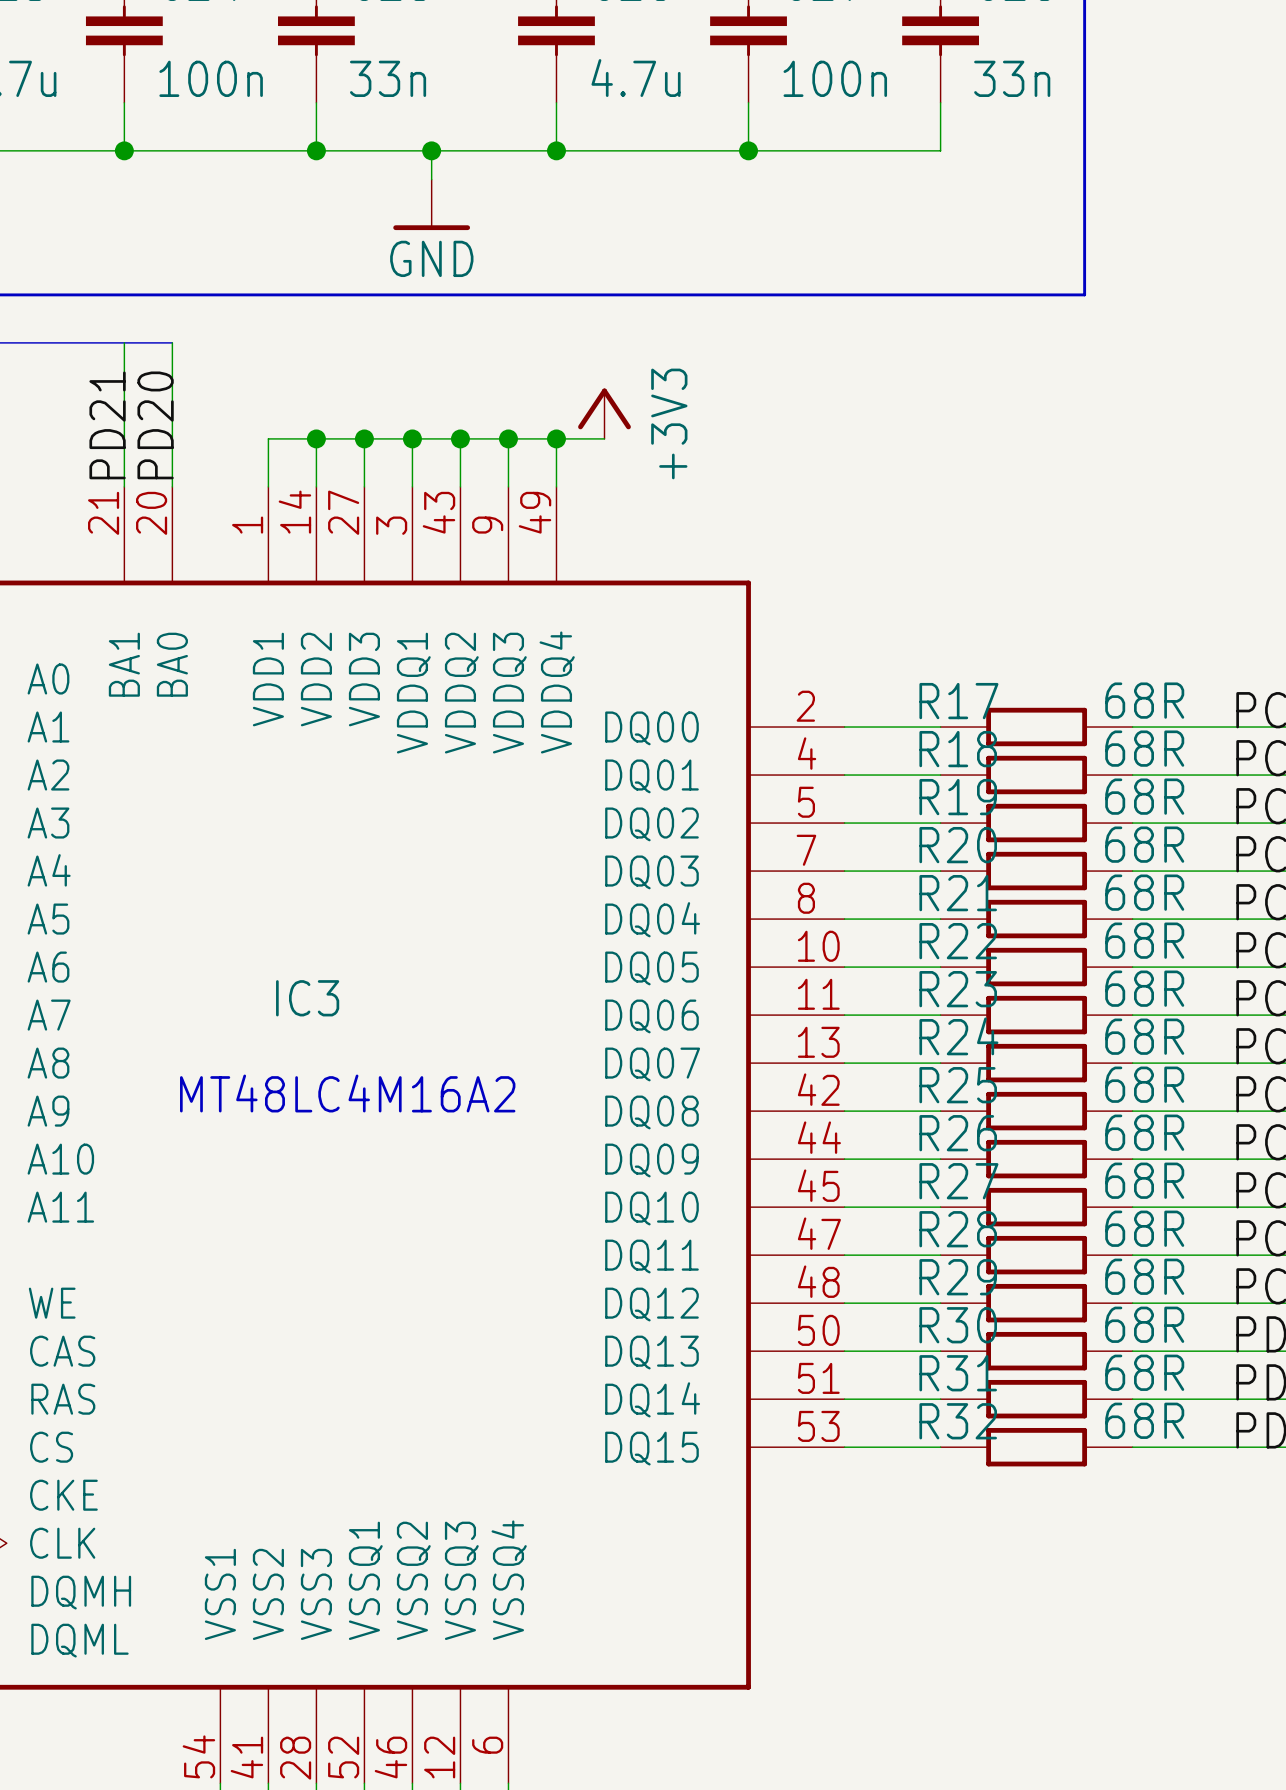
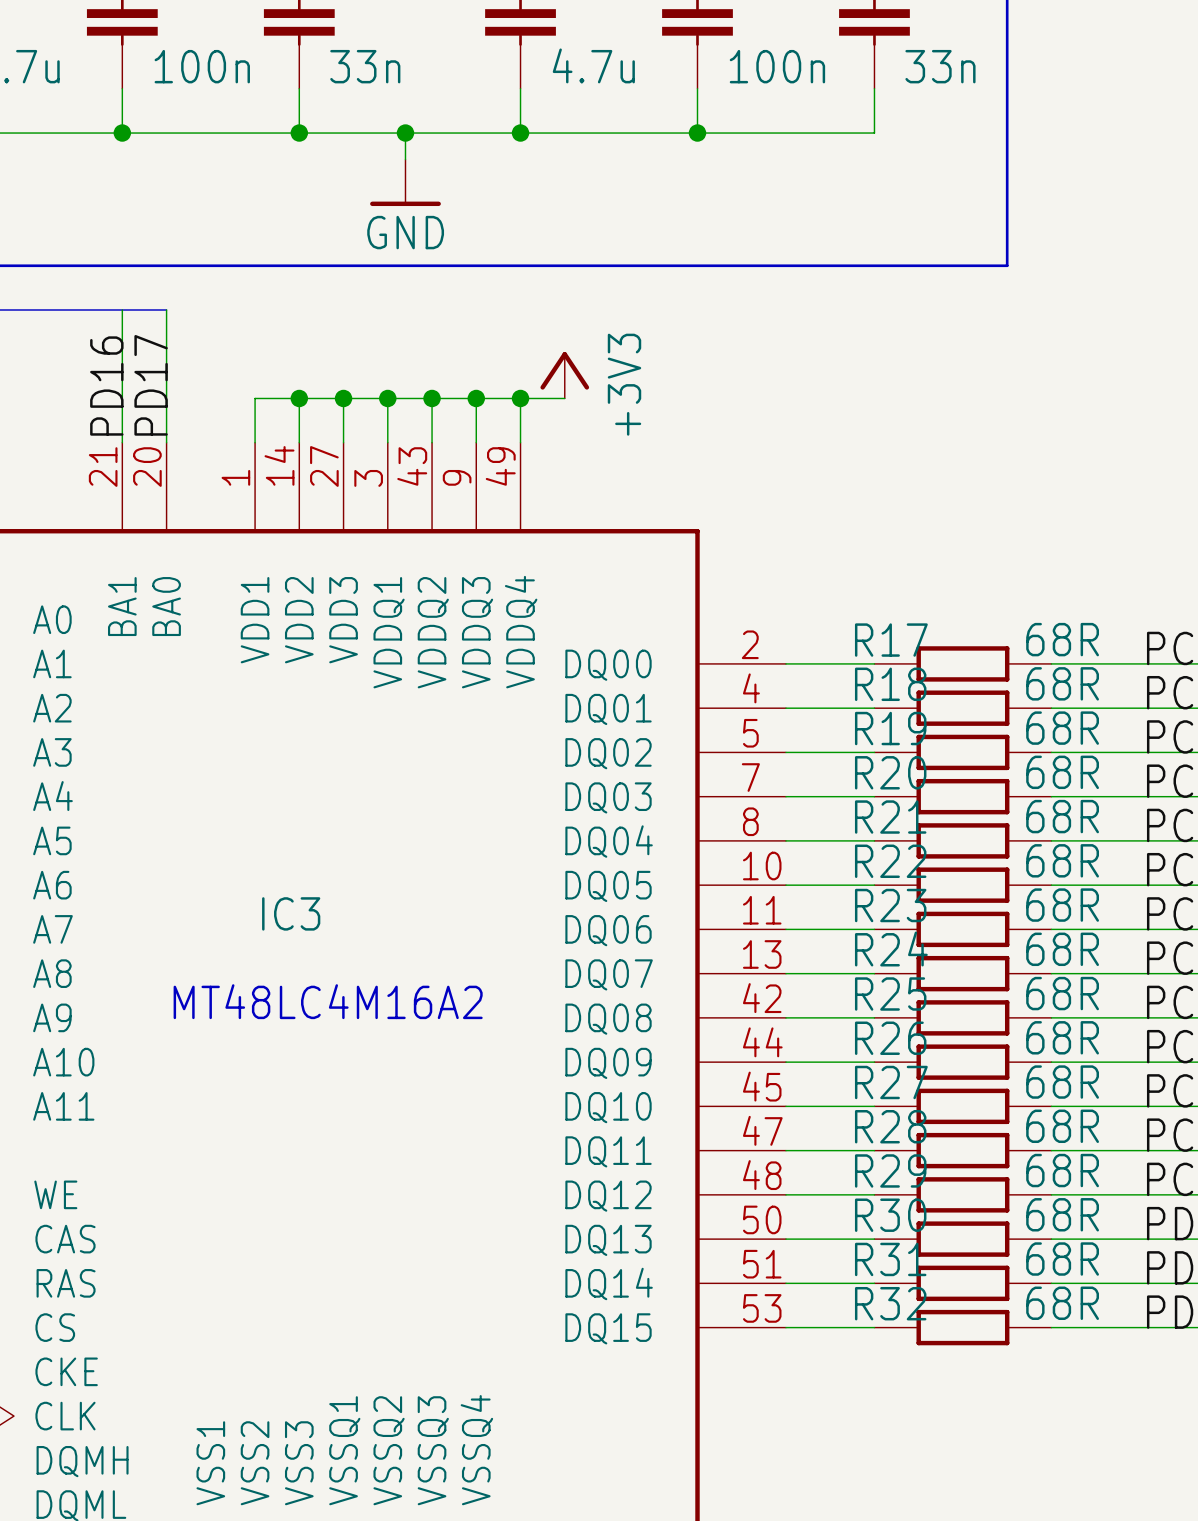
label: PD21 (107, 425) -> PD16 (106, 386)
label: PD20 (155, 425) -> PD17 (151, 385)

